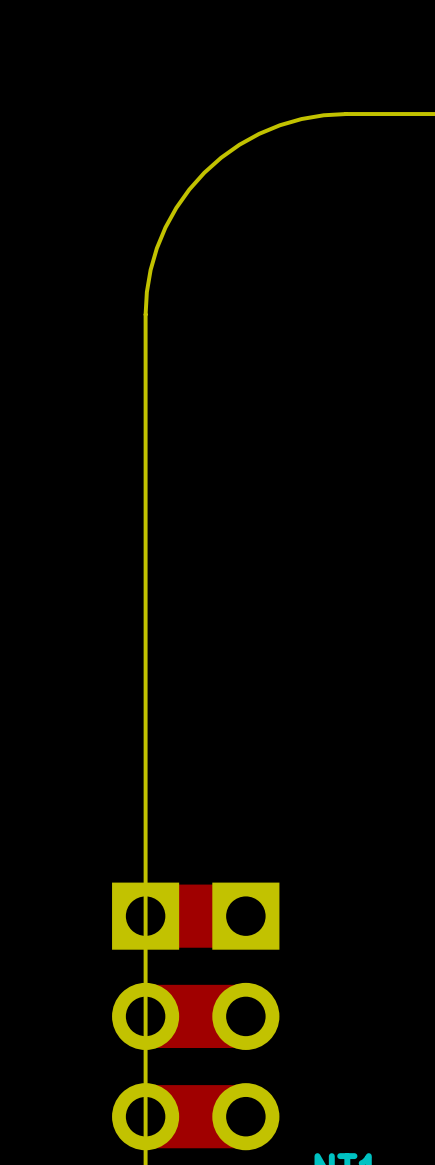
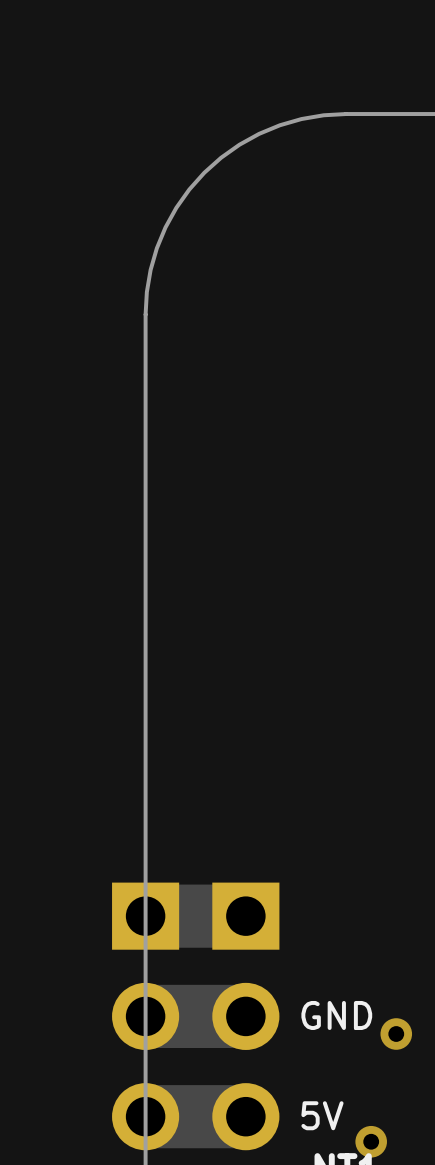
text: none -> GND (336, 1015)
via: none -> (396, 1034)
text: none -> 5V (322, 1115)
via: none -> (371, 1141)

